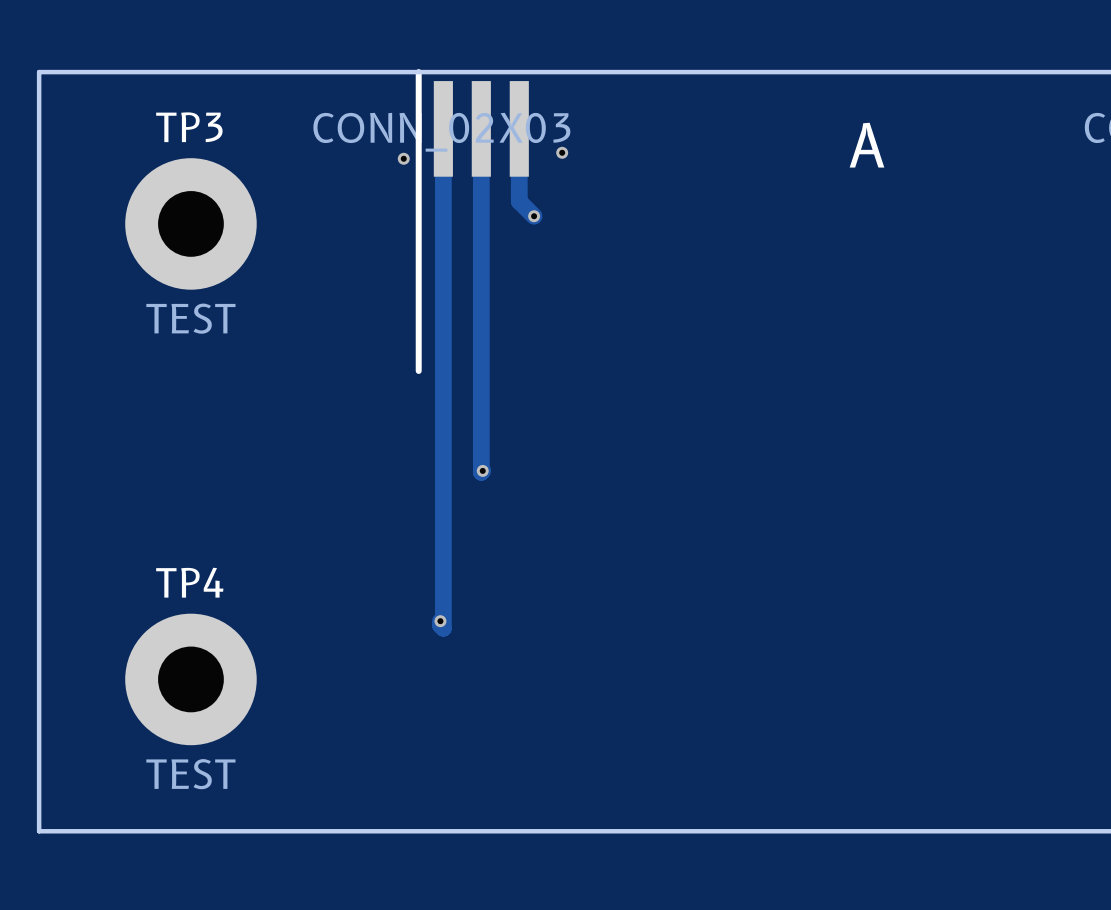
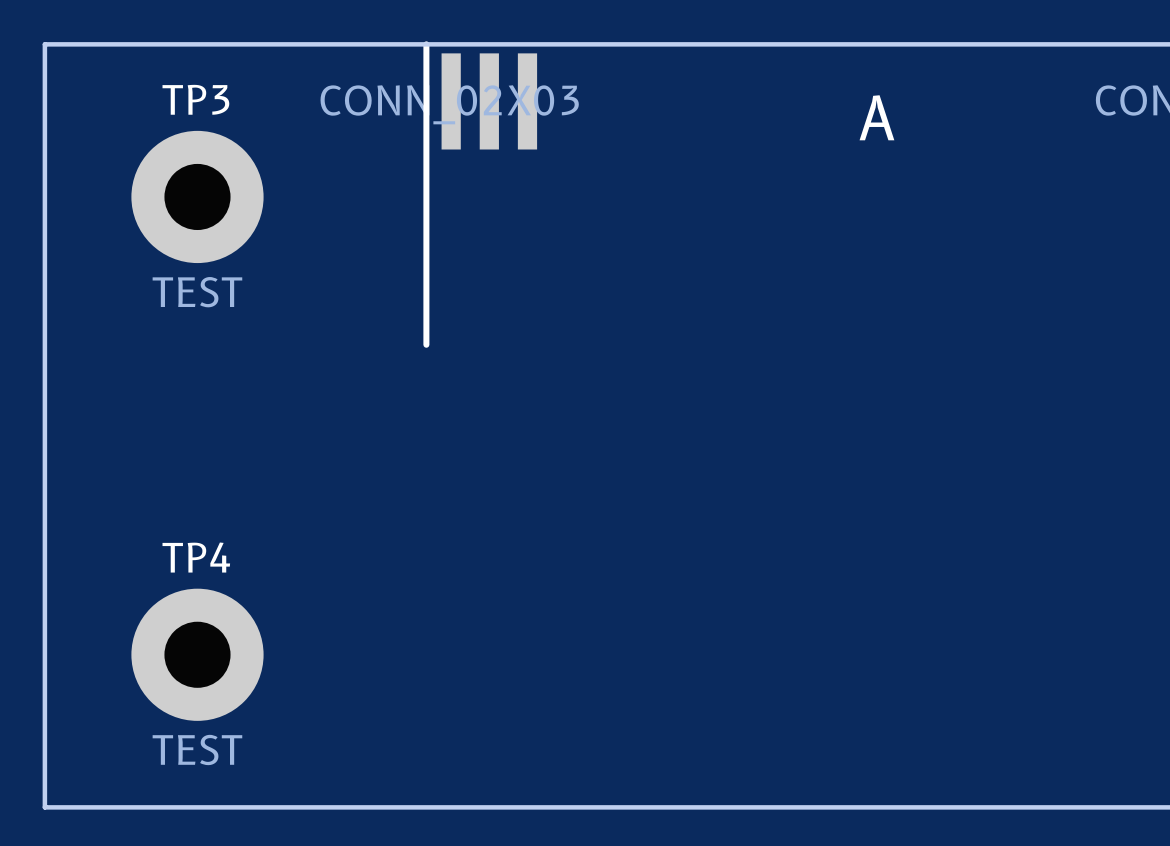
track: (443, 128) (443, 628) (440, 625) (440, 621) -> none
track: (481, 128) (481, 472) (482, 470) -> none
track: (519, 128) (519, 201) (534, 216) -> none
via: (562, 152) -> none
via: (403, 158) -> none
via: (534, 216) -> none
via: (482, 470) -> none
via: (440, 621) -> none

